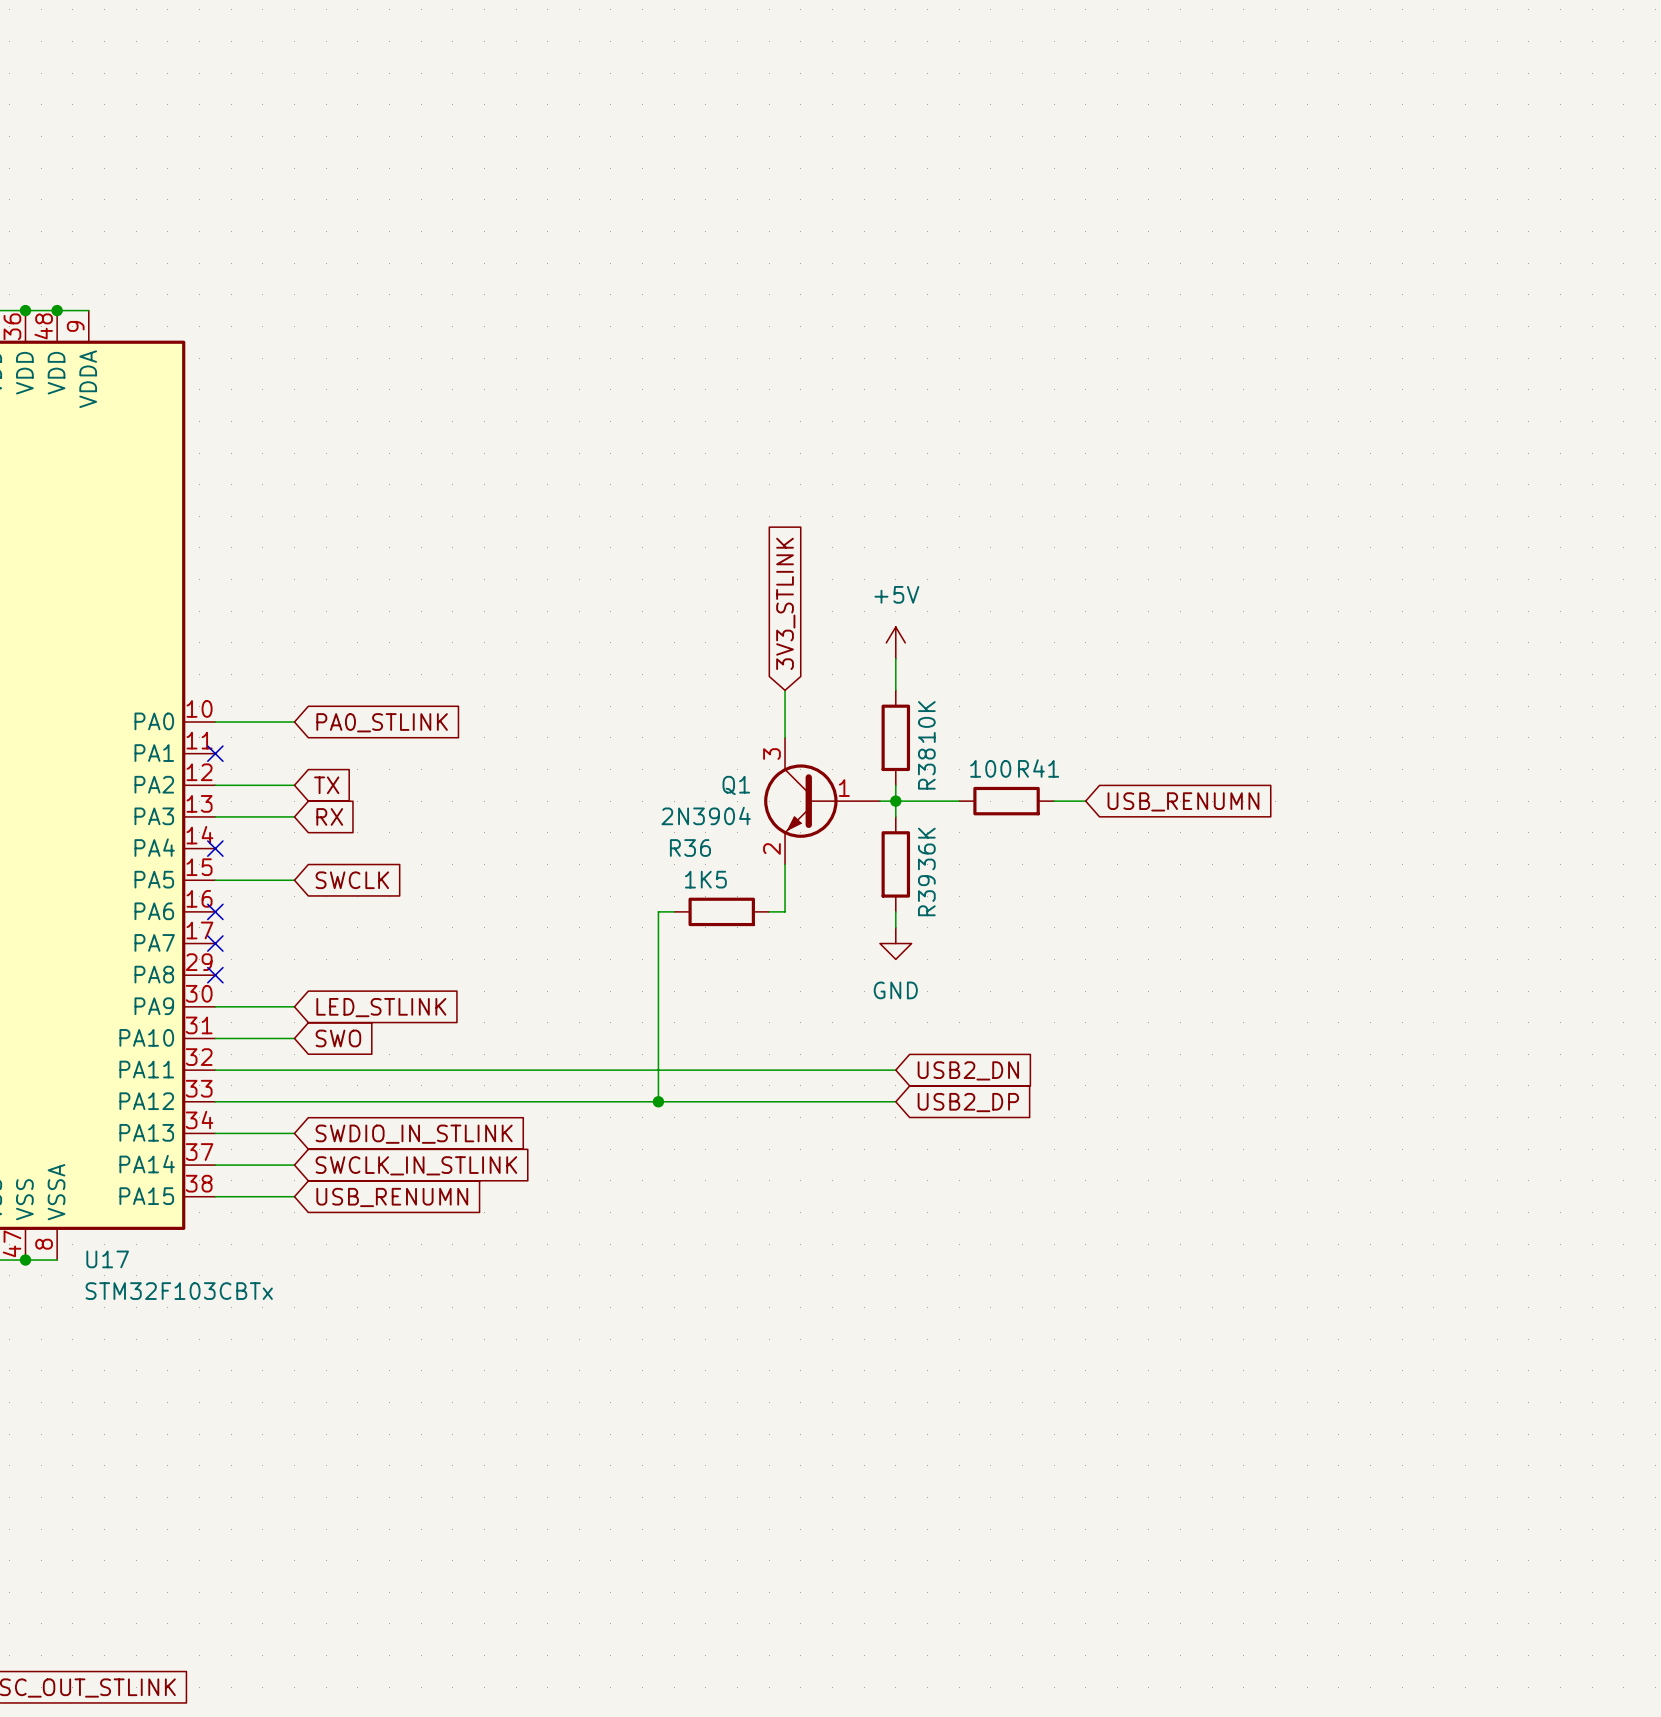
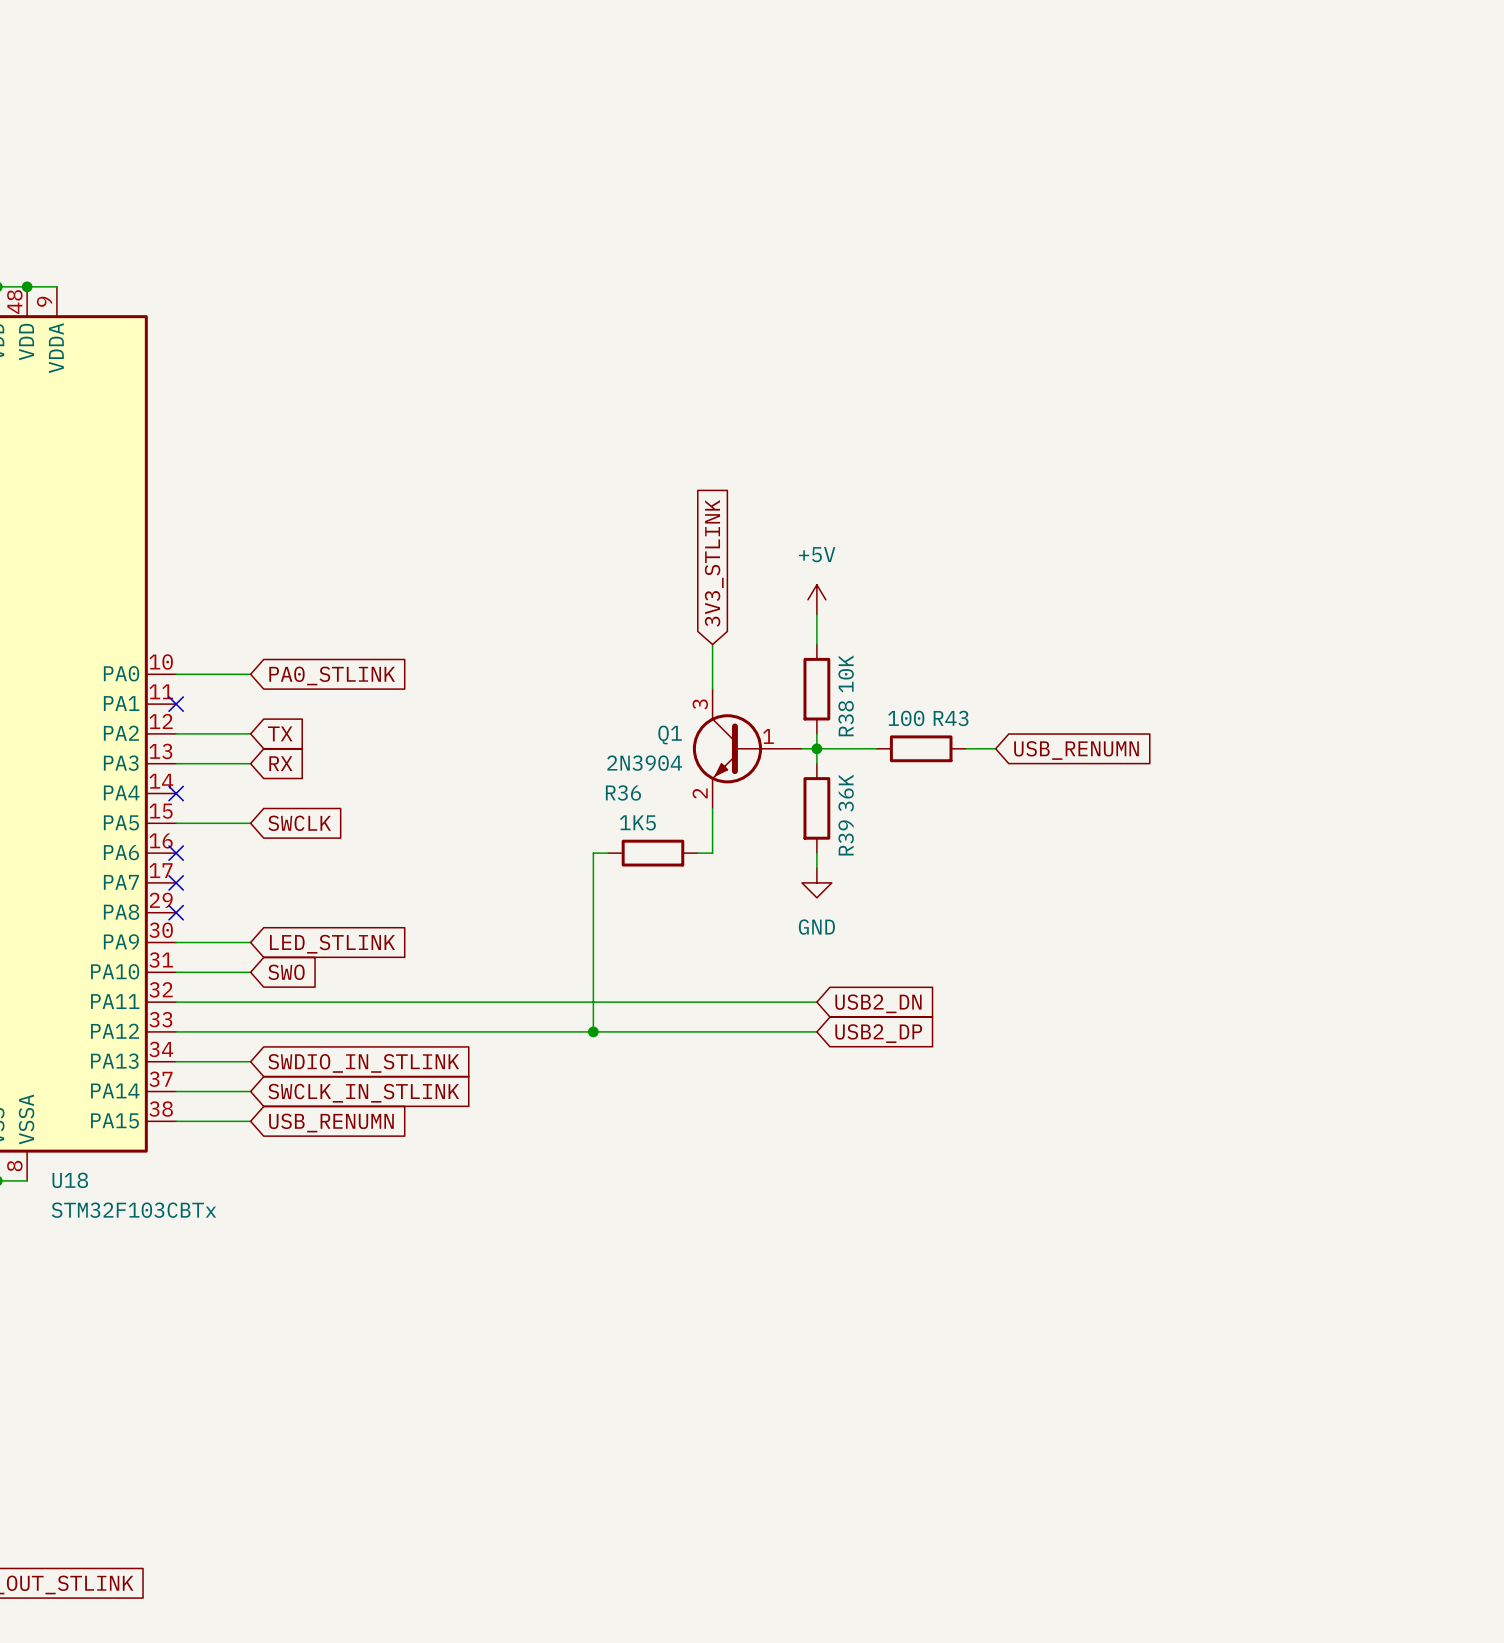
R41 name: R41 (1038, 768) -> R43 (951, 718)
U17 name: U17 (107, 1259) -> U18 (70, 1180)

